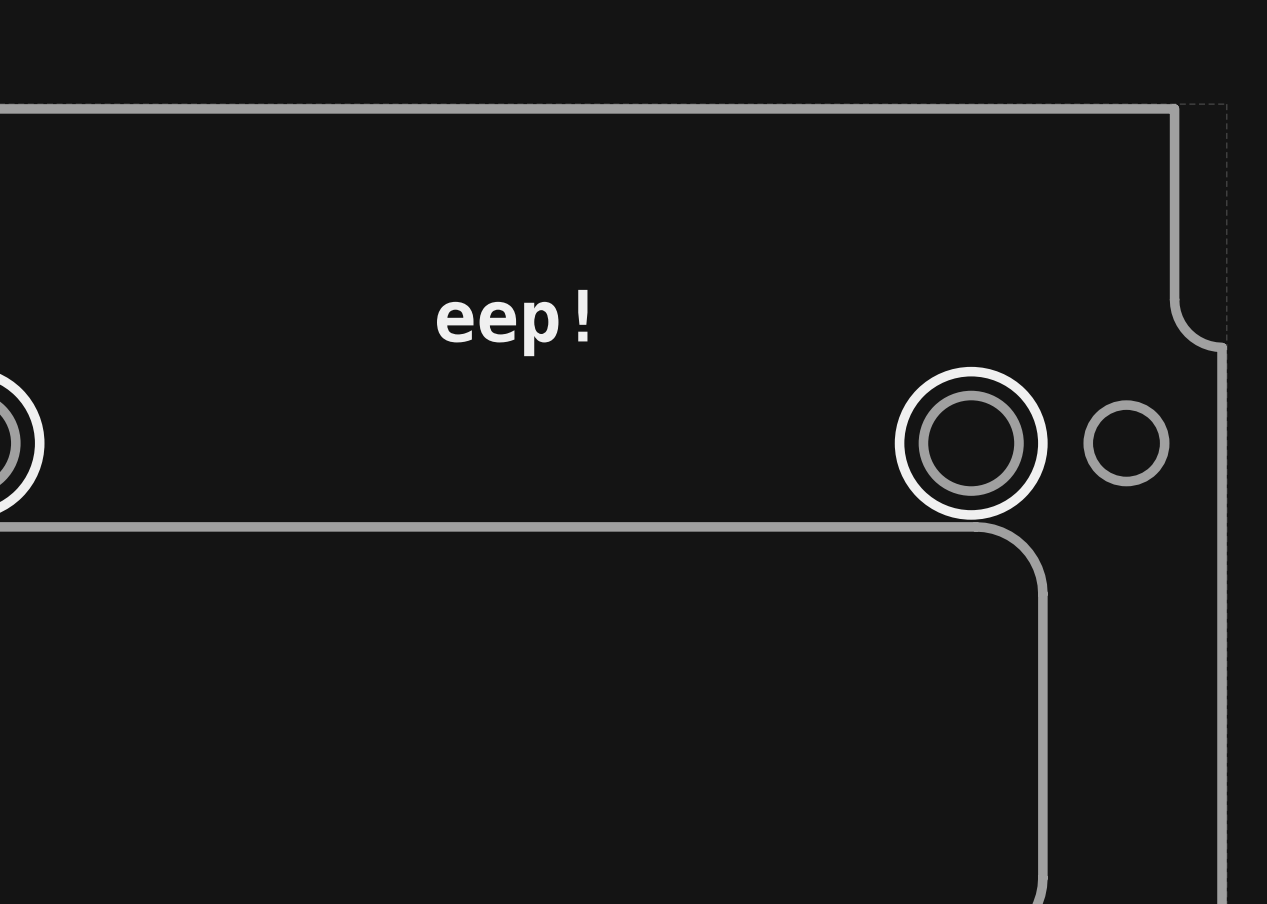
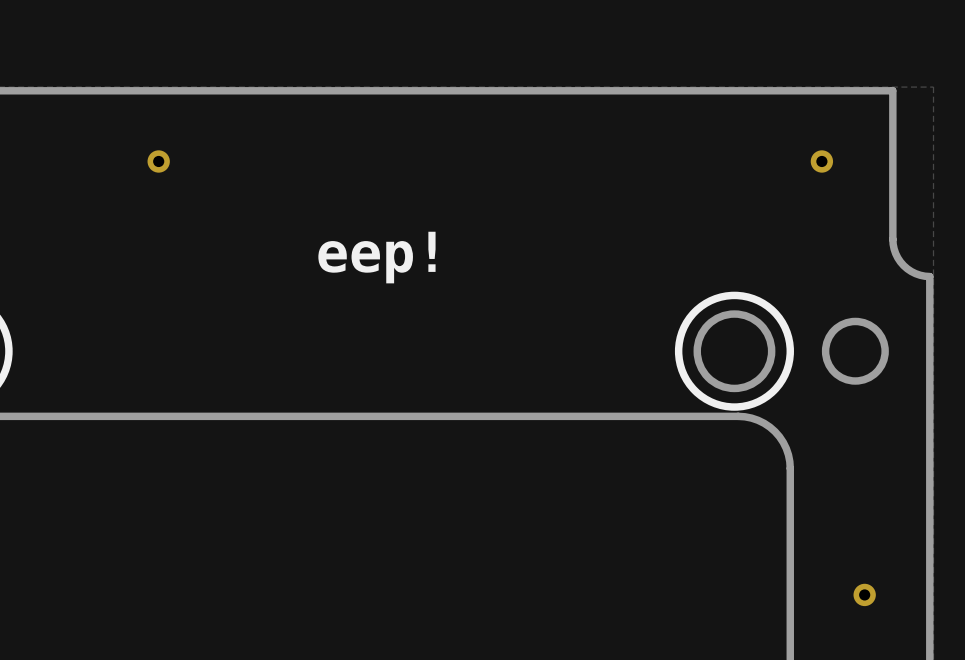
via: none -> (158, 161)
via: none -> (821, 161)
via: none -> (864, 594)

